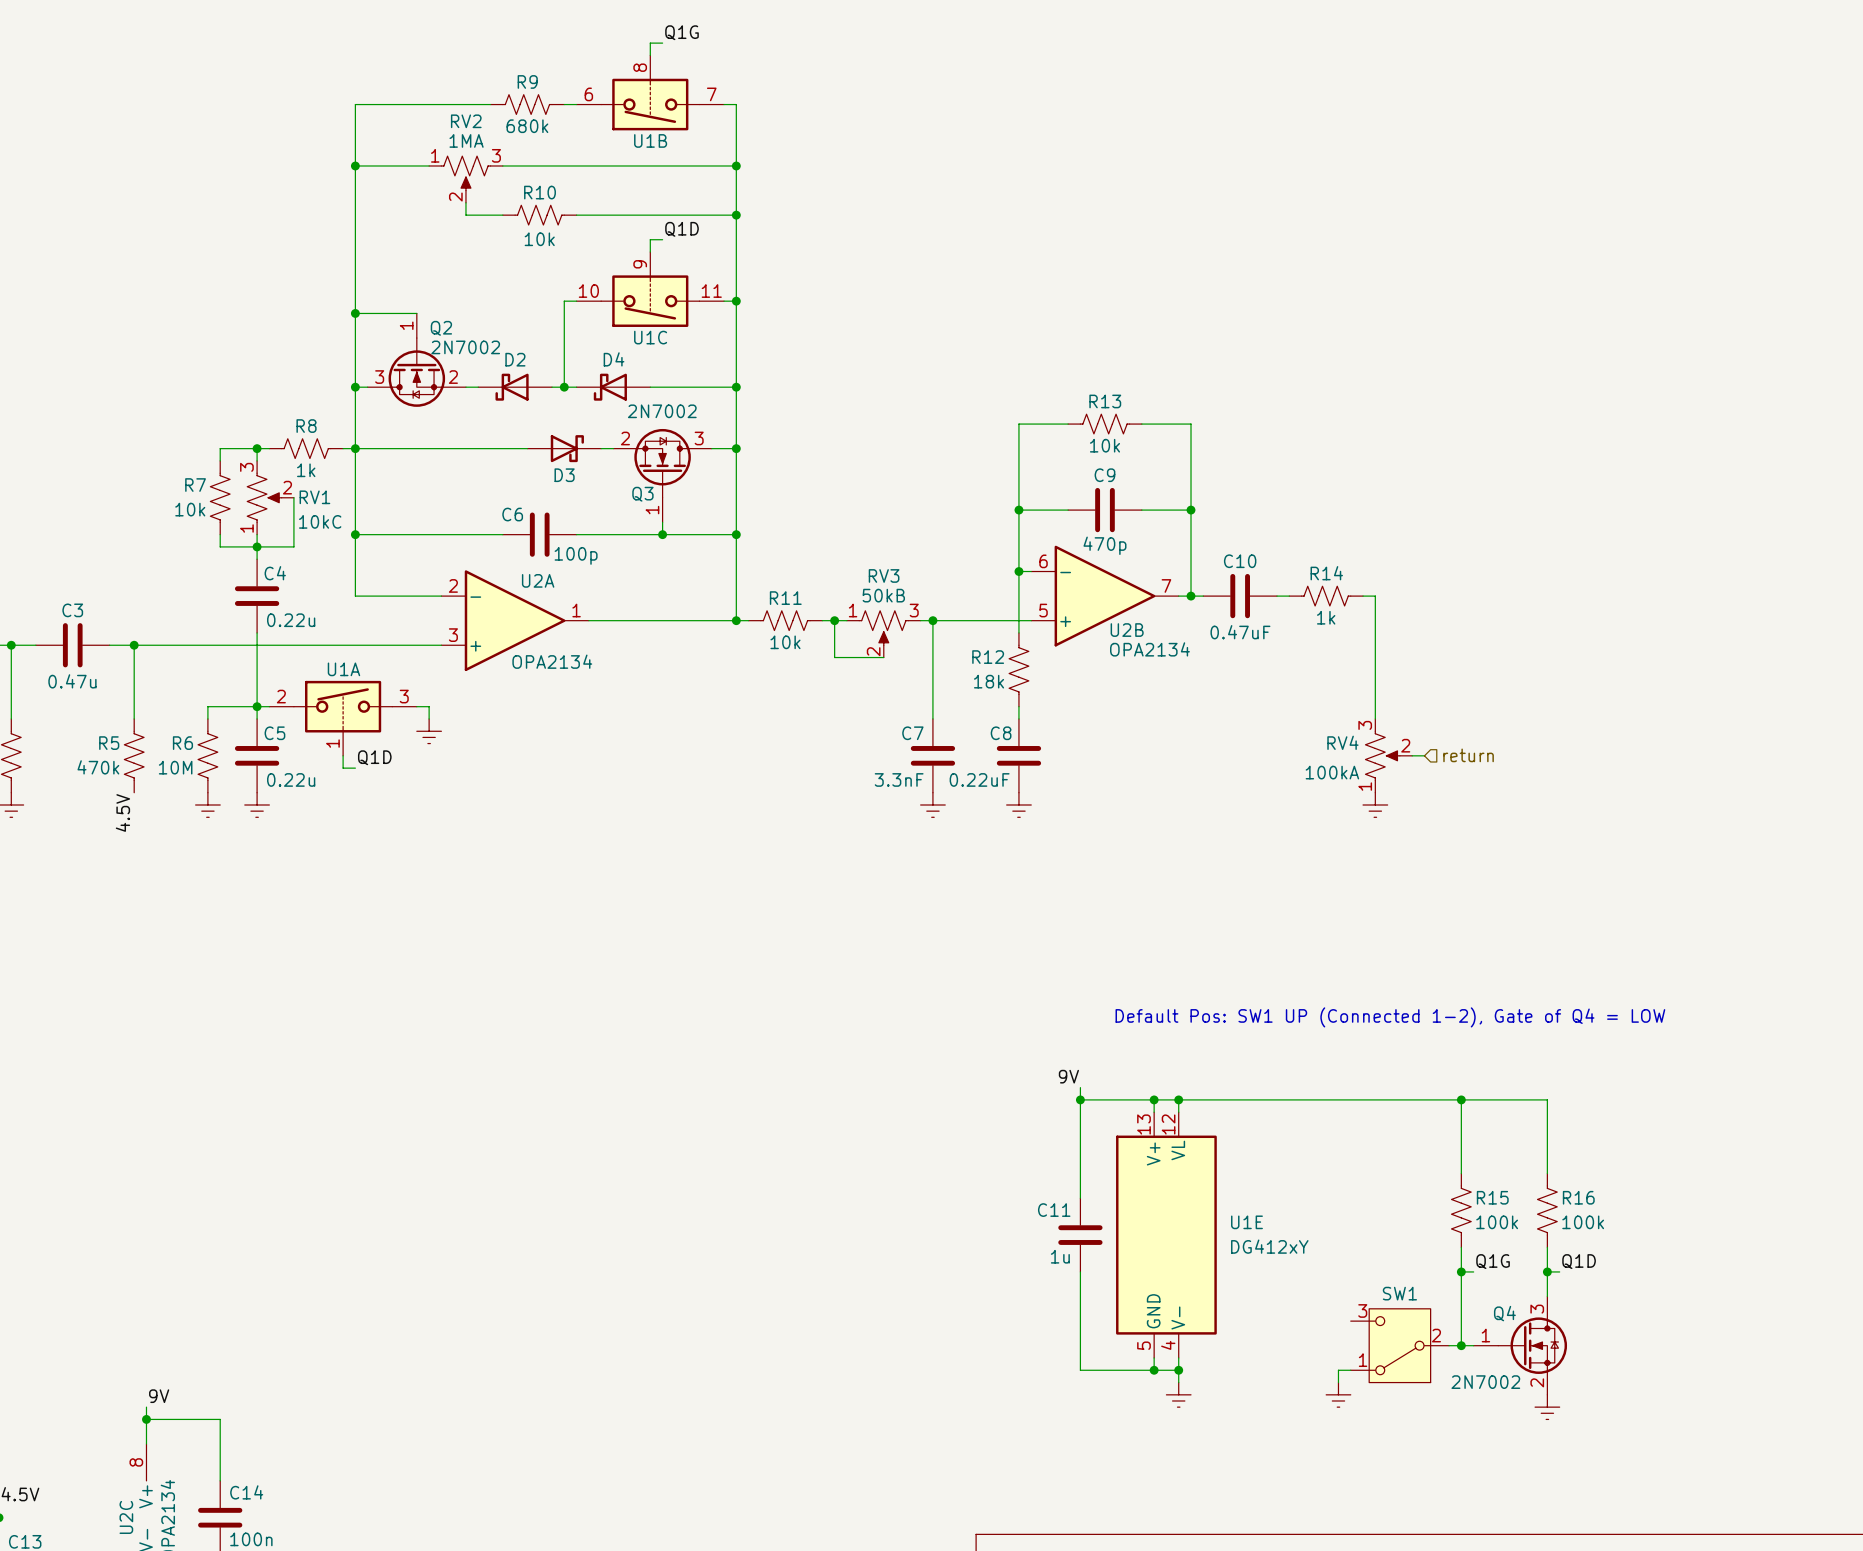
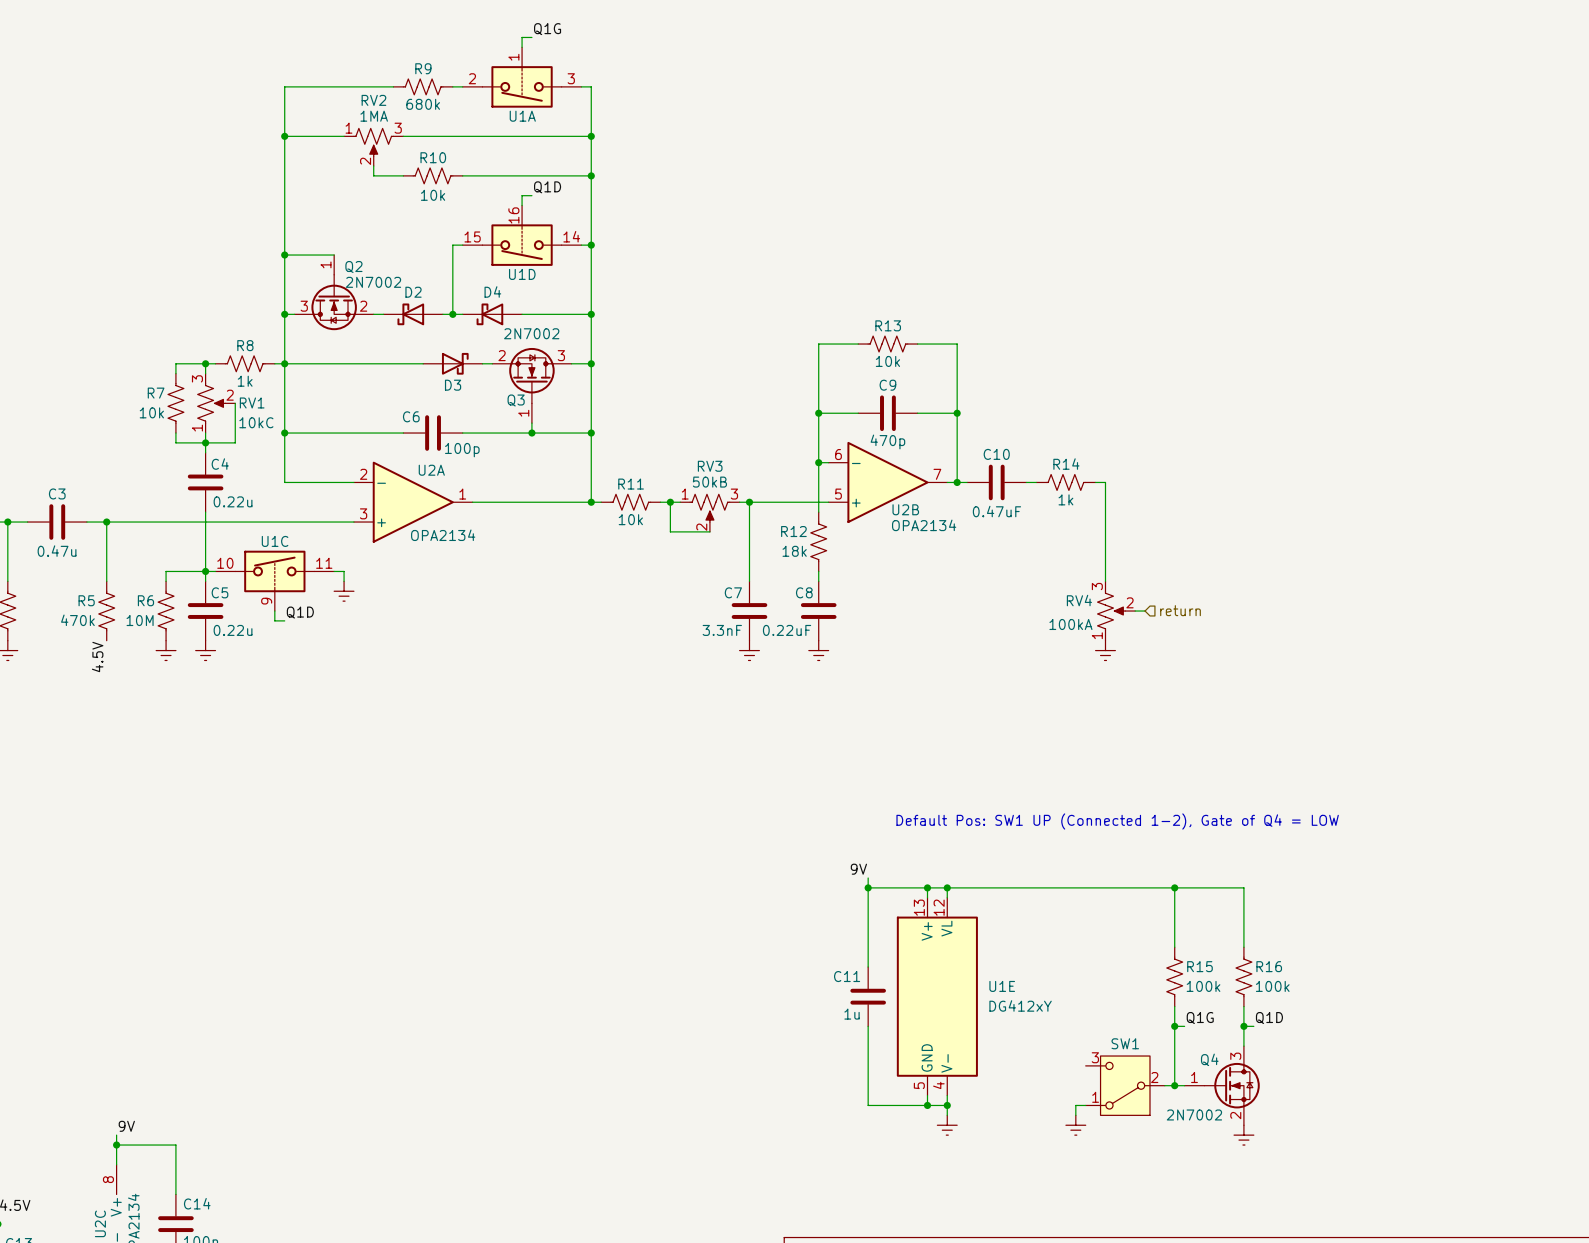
U1B: (650, 92) -> none
U1C position: (650, 289) -> (274, 580)
U1D: none -> (522, 235)
U1C flip: as is (650, 301) -> up-down (274, 571)
U1A flip: as is (343, 706) -> up-down (522, 86)
U1A position: (343, 718) -> (522, 77)

